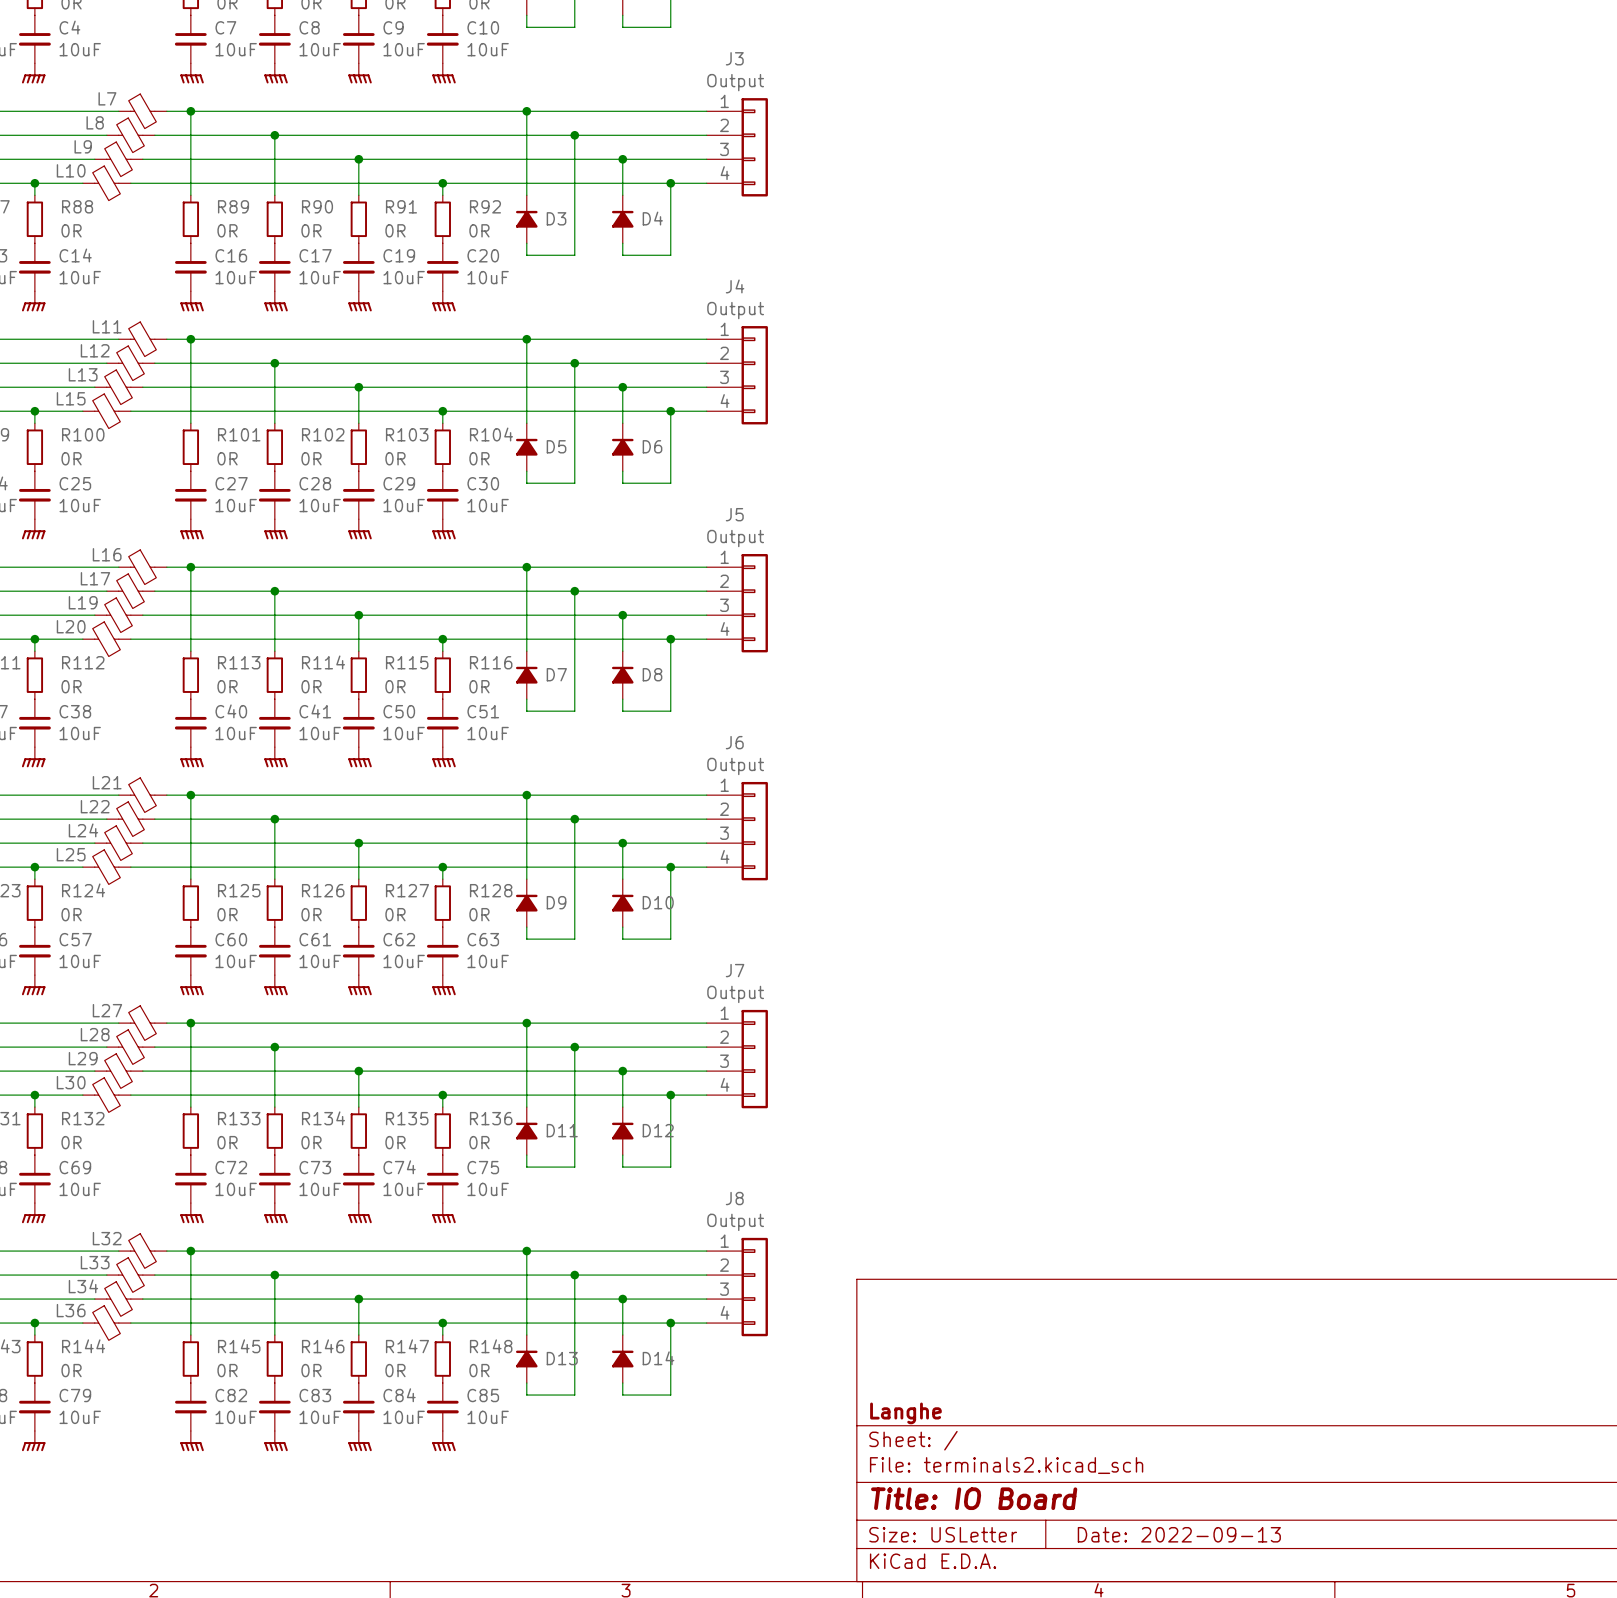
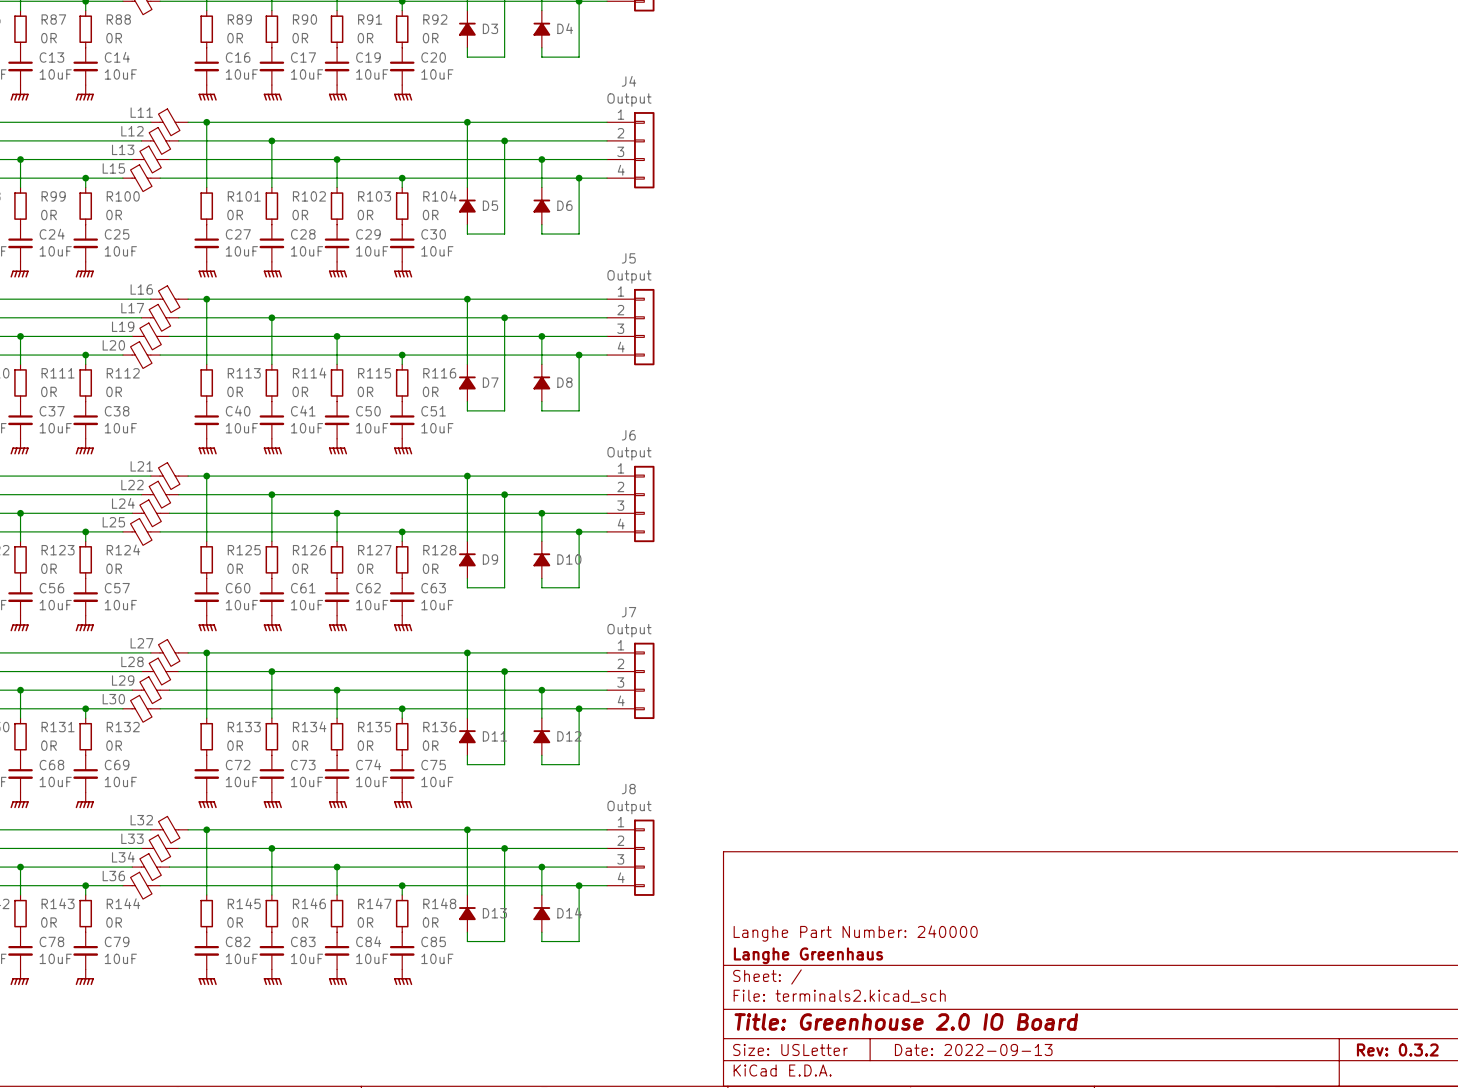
title block: none -> Langhe Part Number: 240000 (855, 933)
title block: Langhe (905, 1413) -> Langhe Greenhaus (808, 955)
title block: Title: IO Board (974, 1498) -> Title: Greenhouse 2.0 IO Board (906, 1021)

